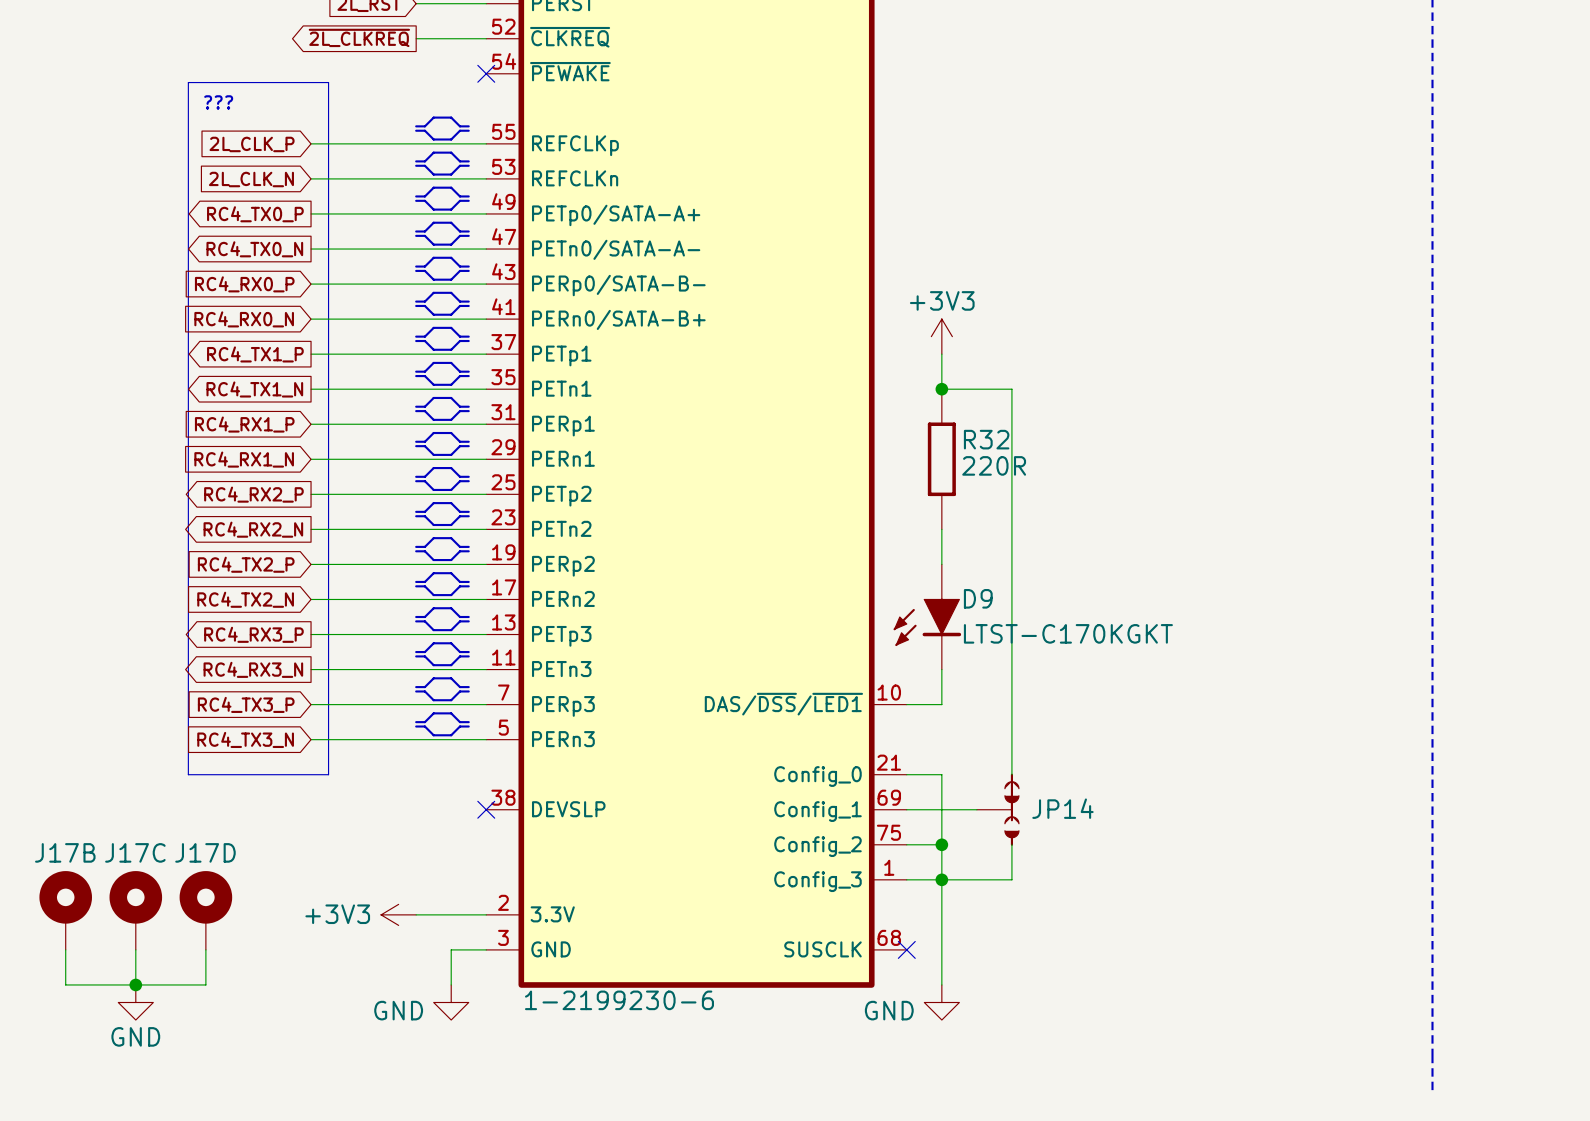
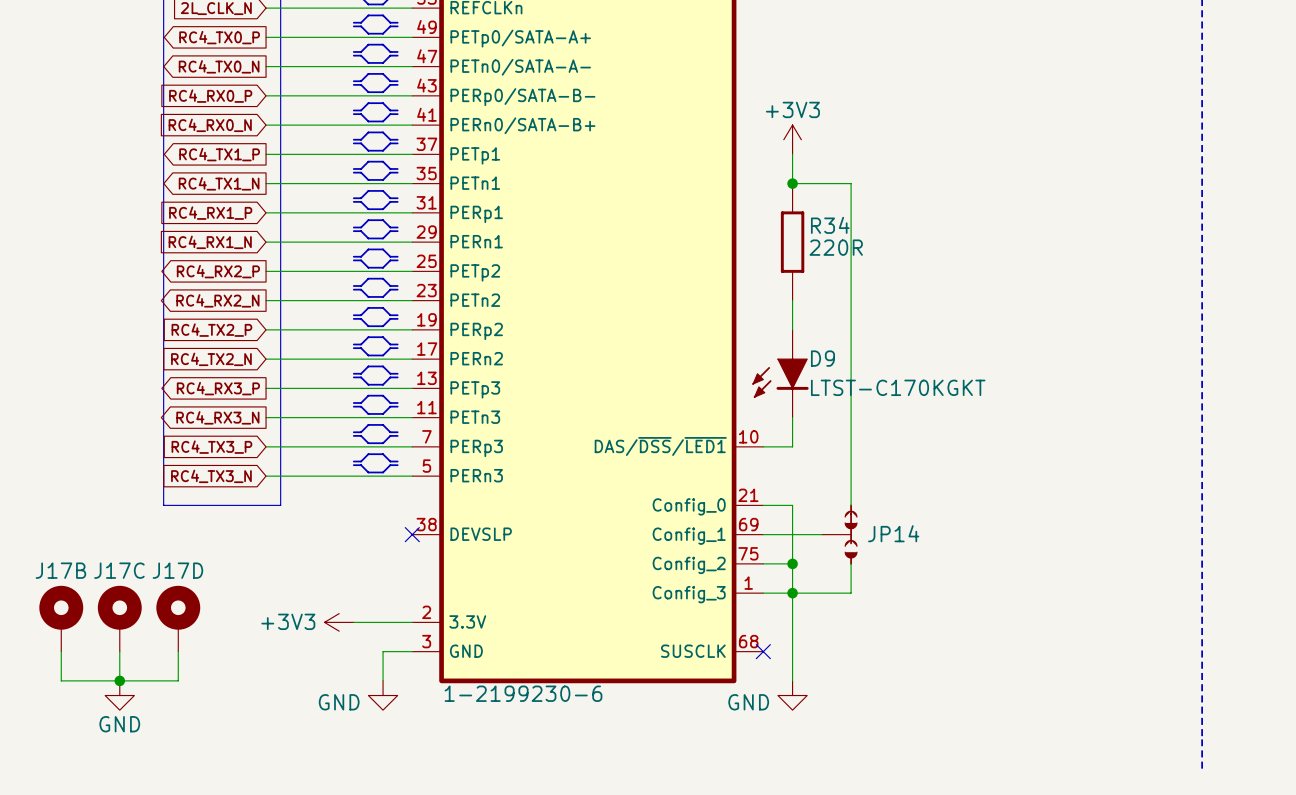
R32 name: R32 (986, 439) -> R34 (830, 225)

